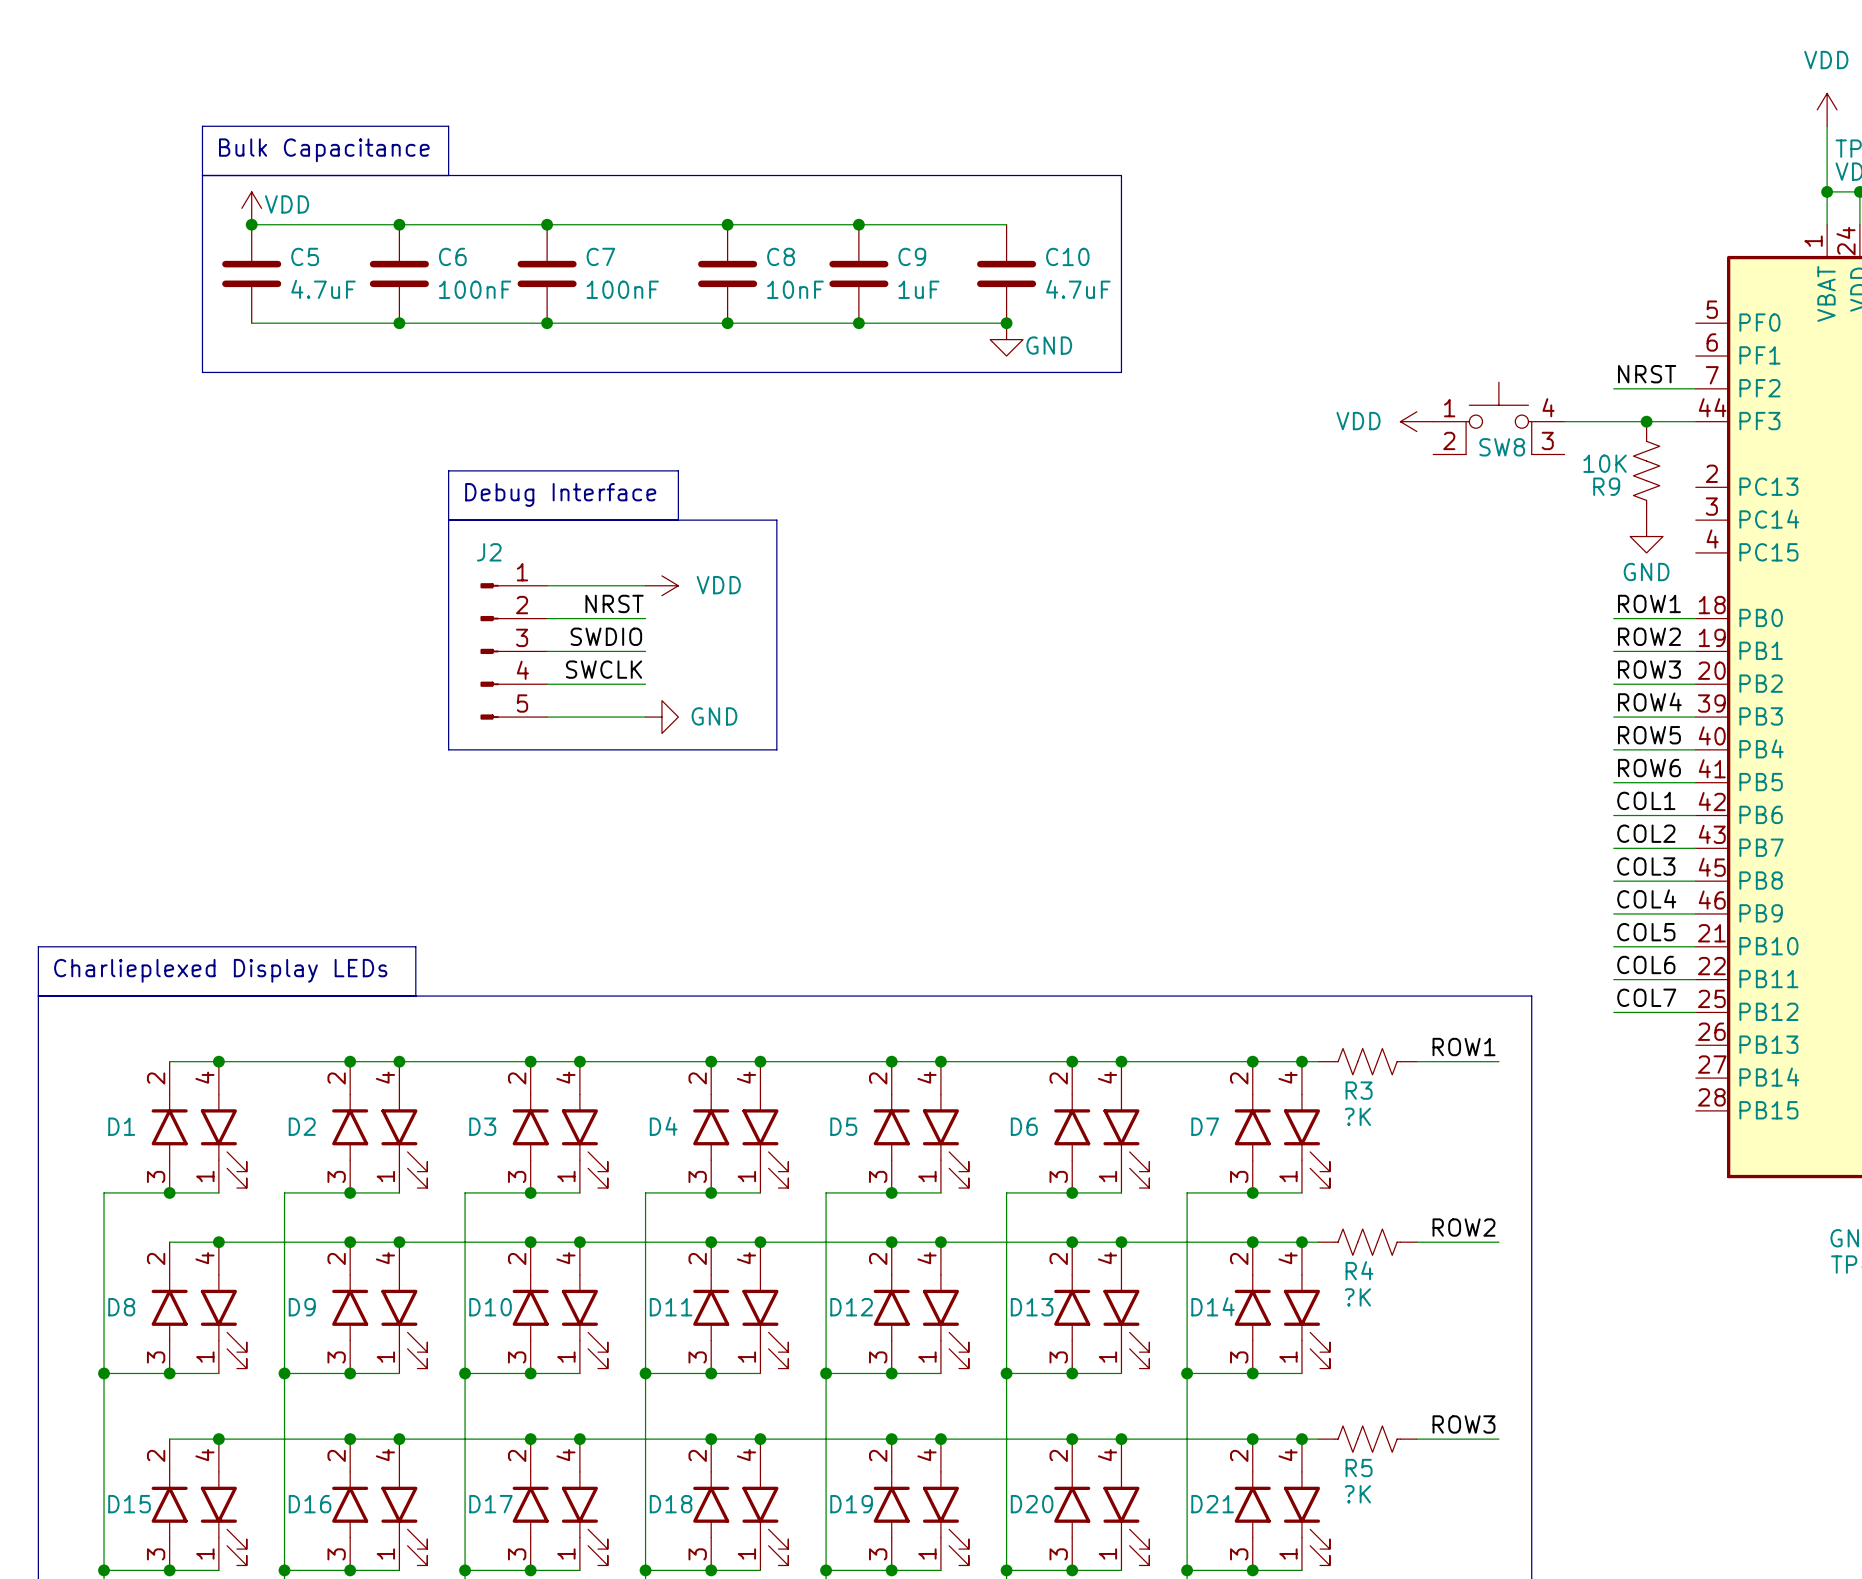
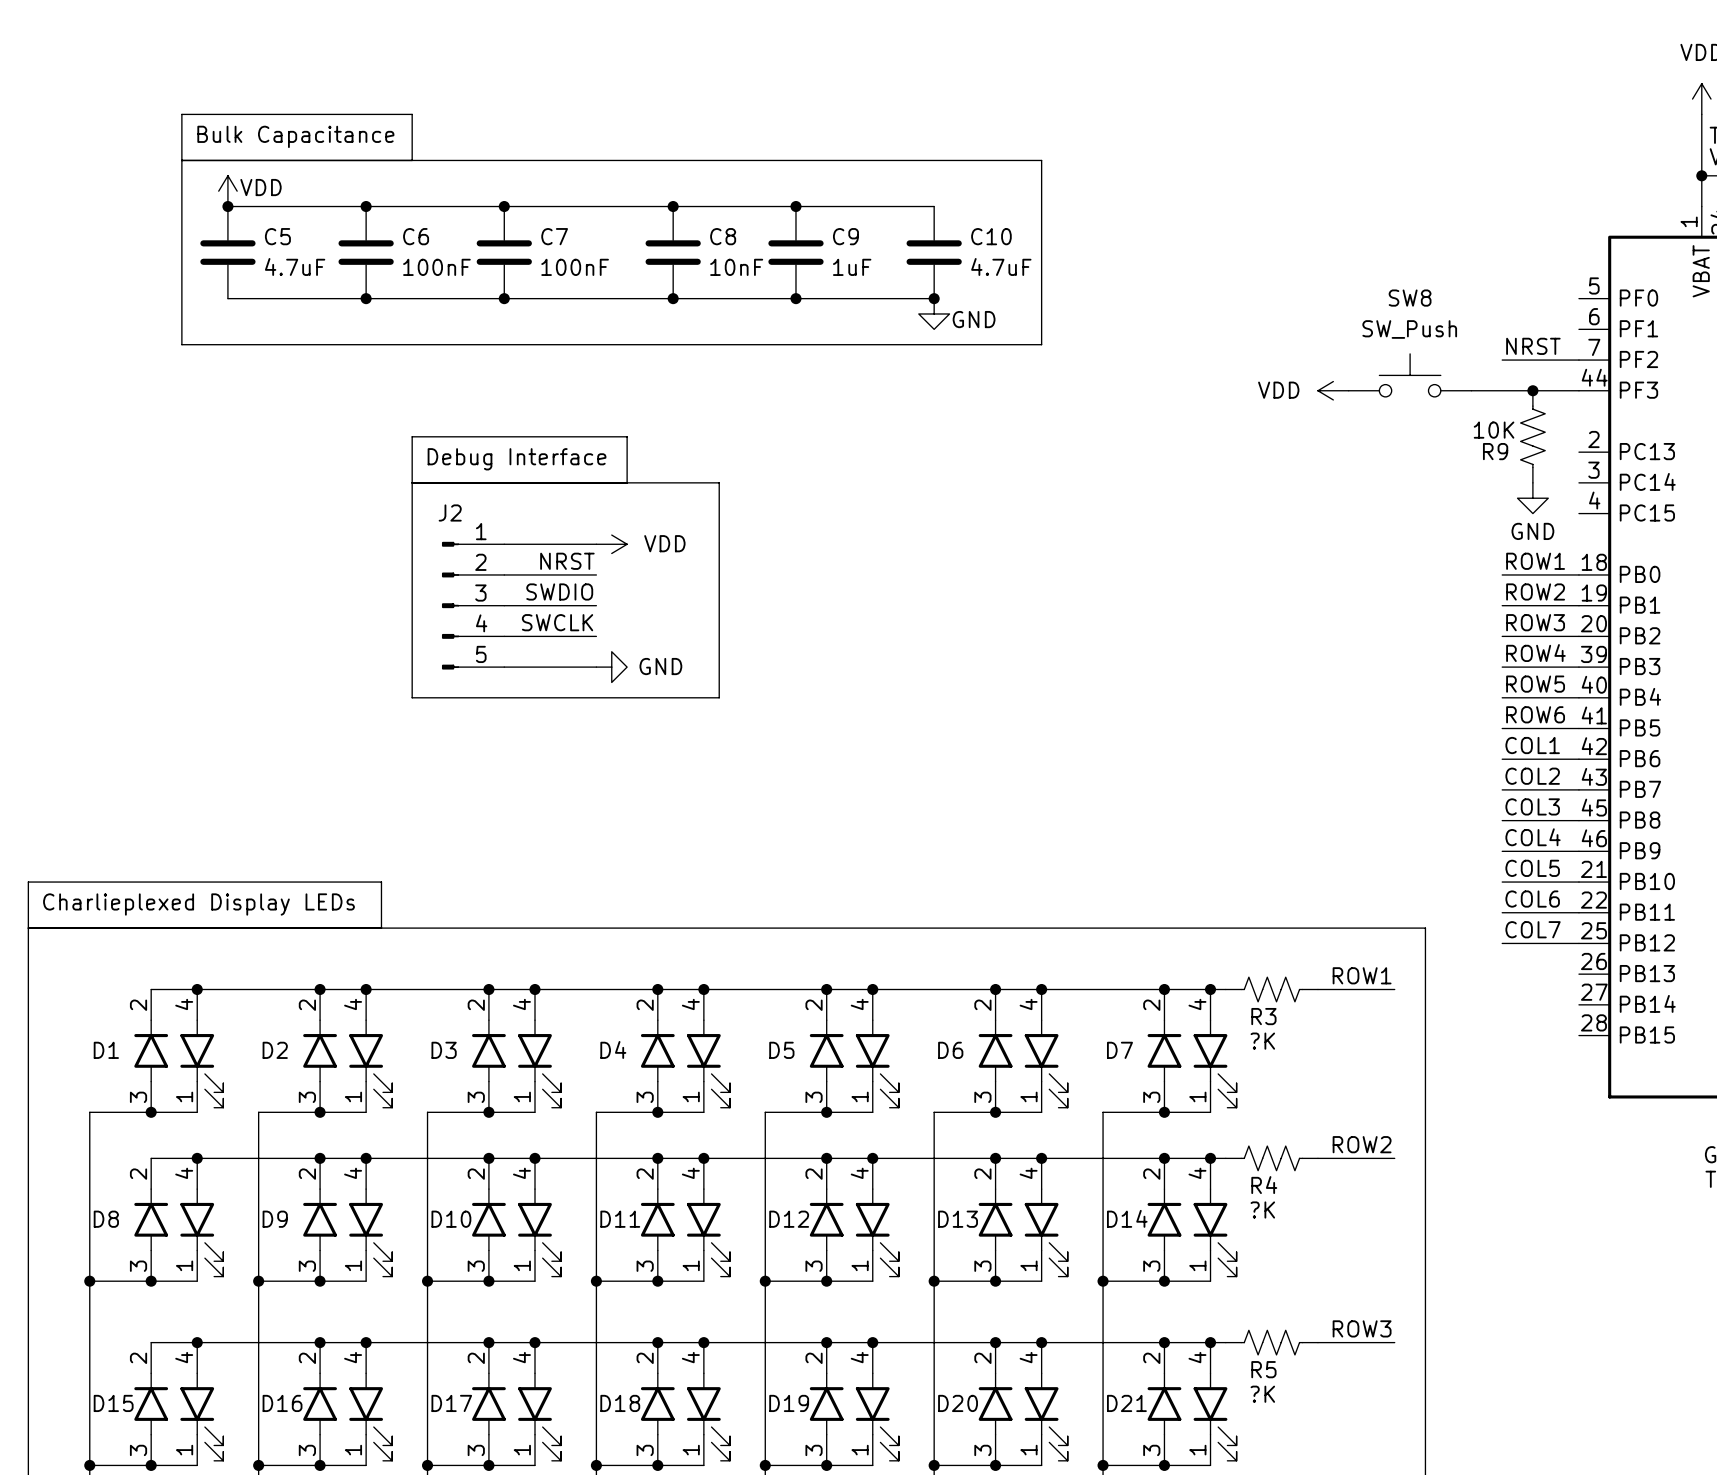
SW8 value: none -> SW_Push (1409, 329)
SW8 symbol: [1433, 382, 1565, 455] -> [1348, 353, 1472, 397]
power symbol position: VDD (1416, 421) -> VDD (1333, 390)
SW8 name position: SW8 (1502, 447) -> SW8 (1410, 298)

